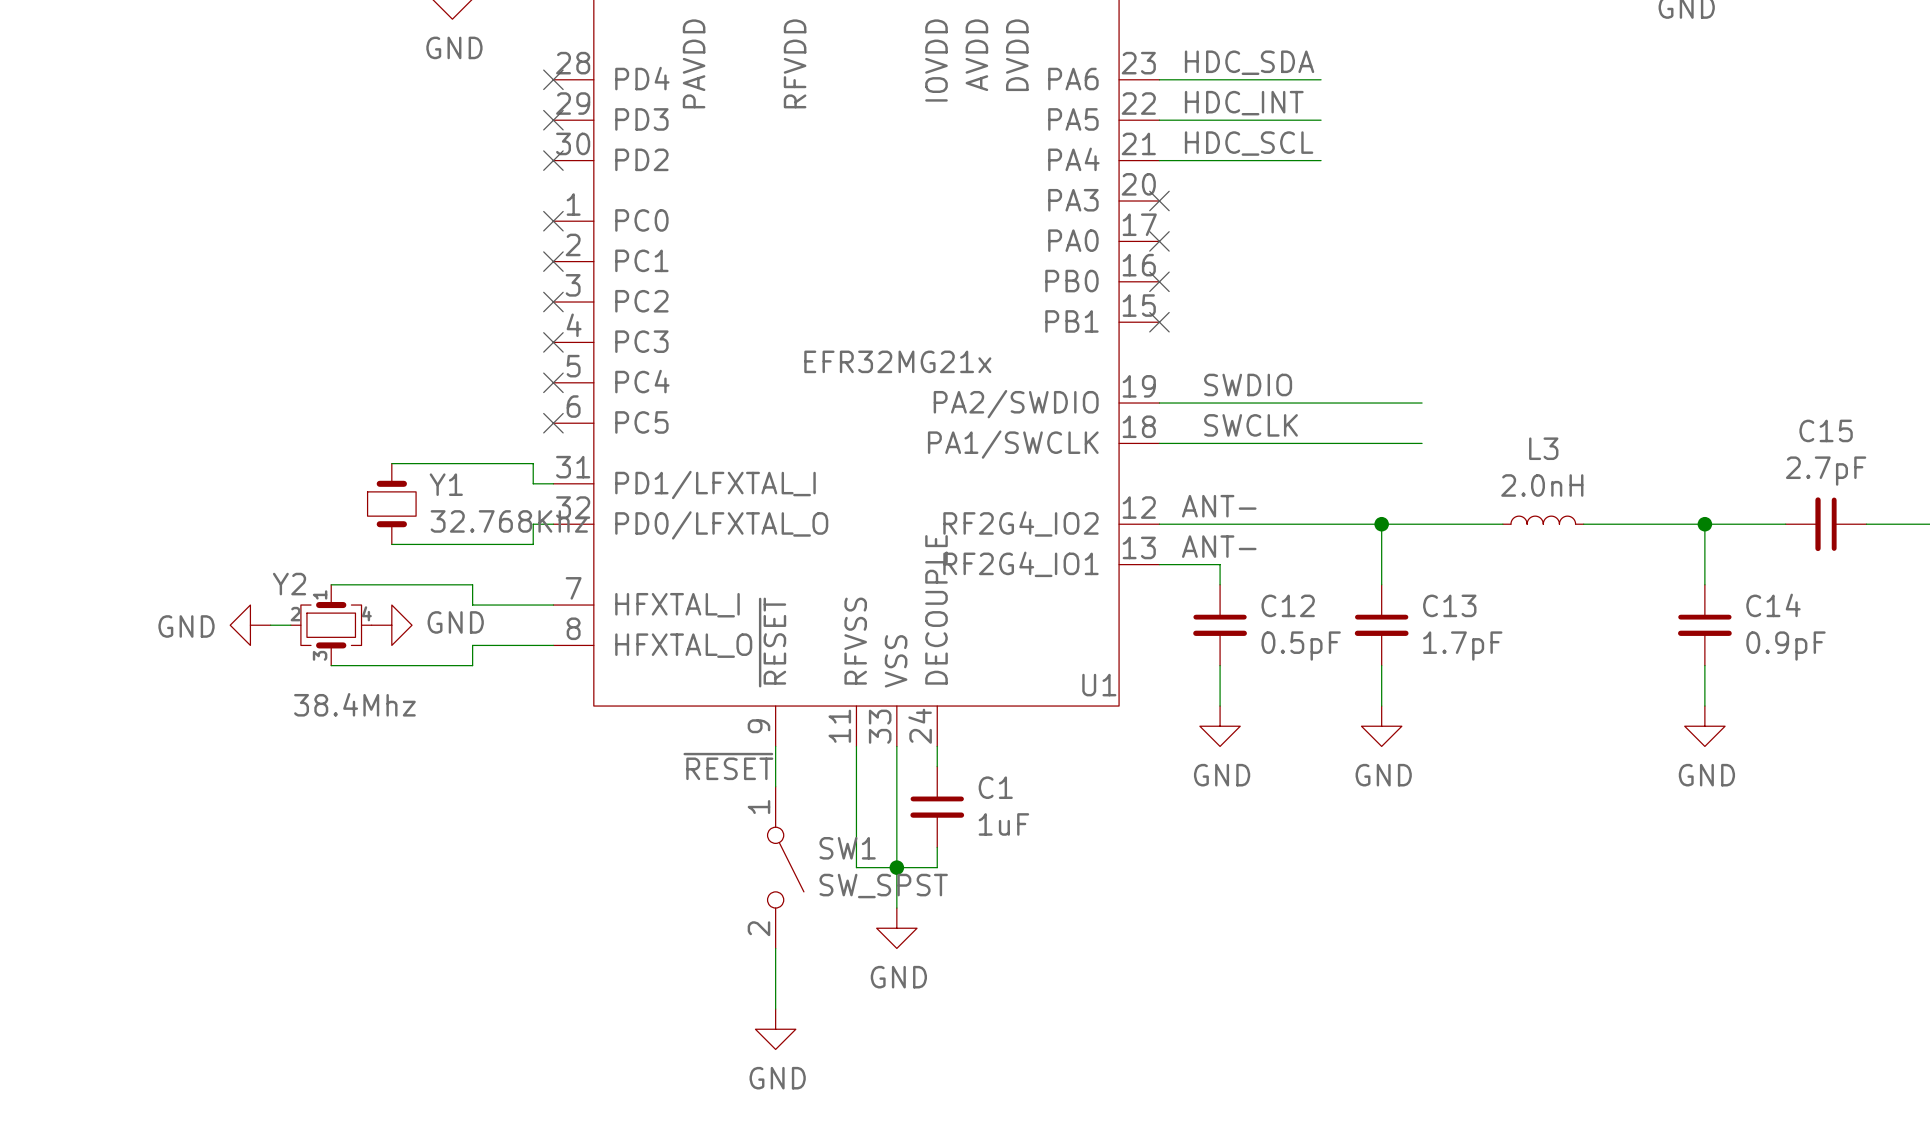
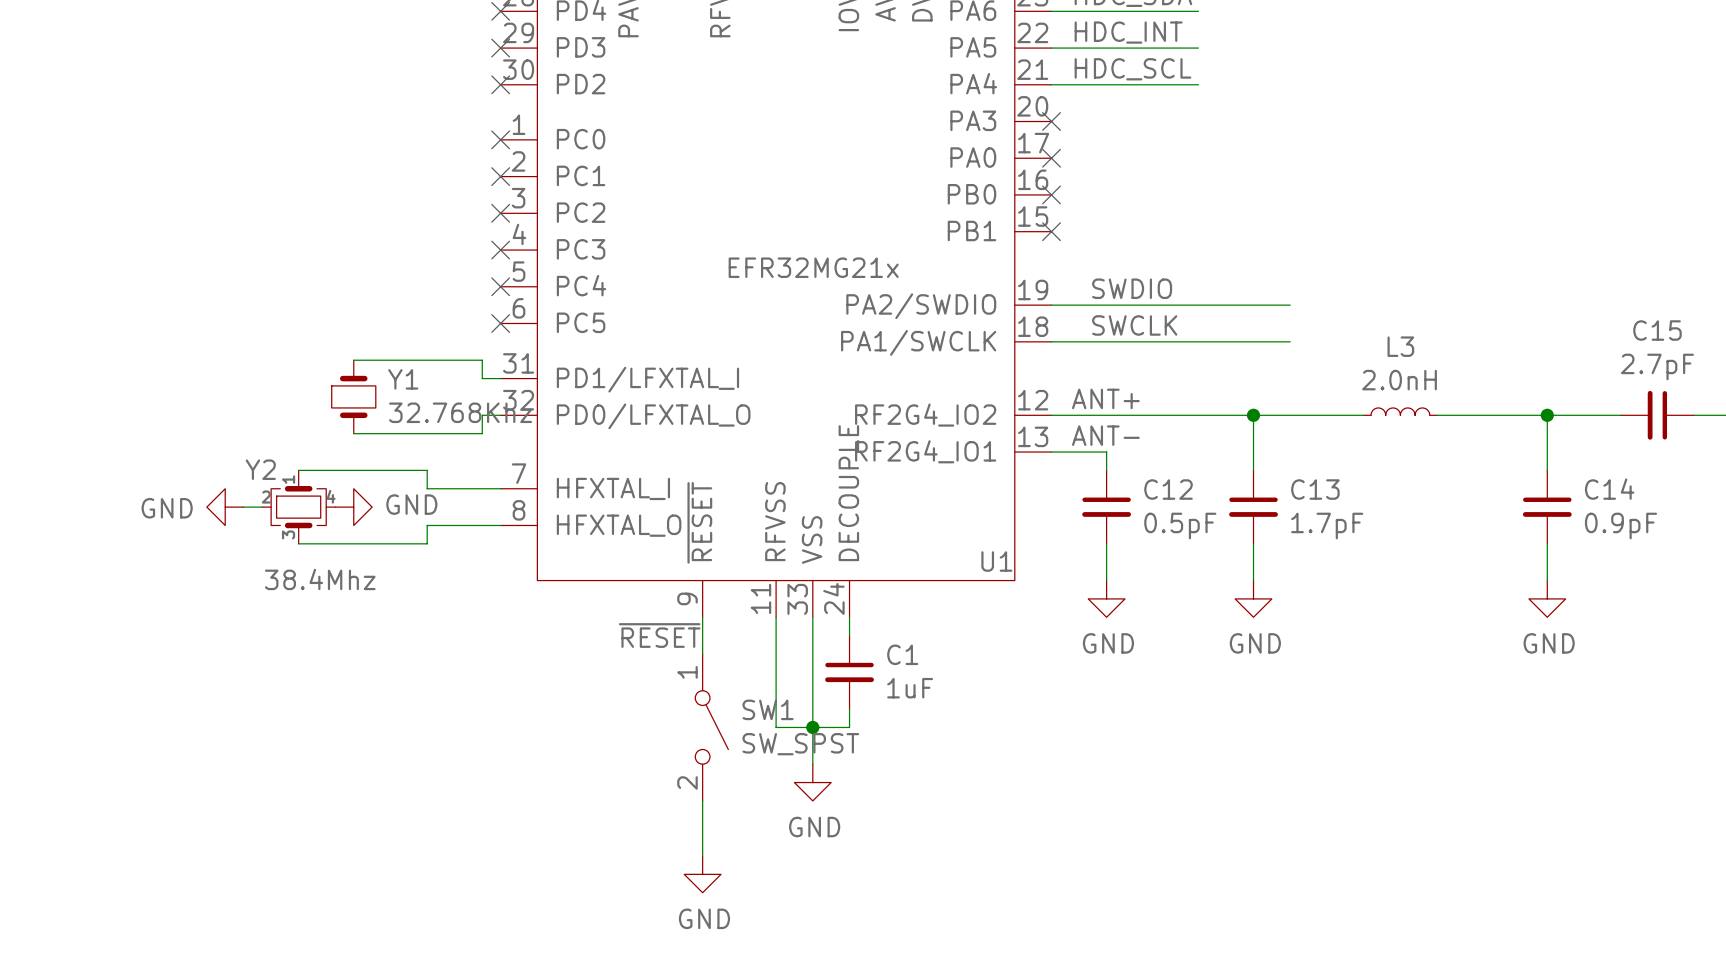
label: ANT- (1219, 506) -> ANT+ (1105, 398)

